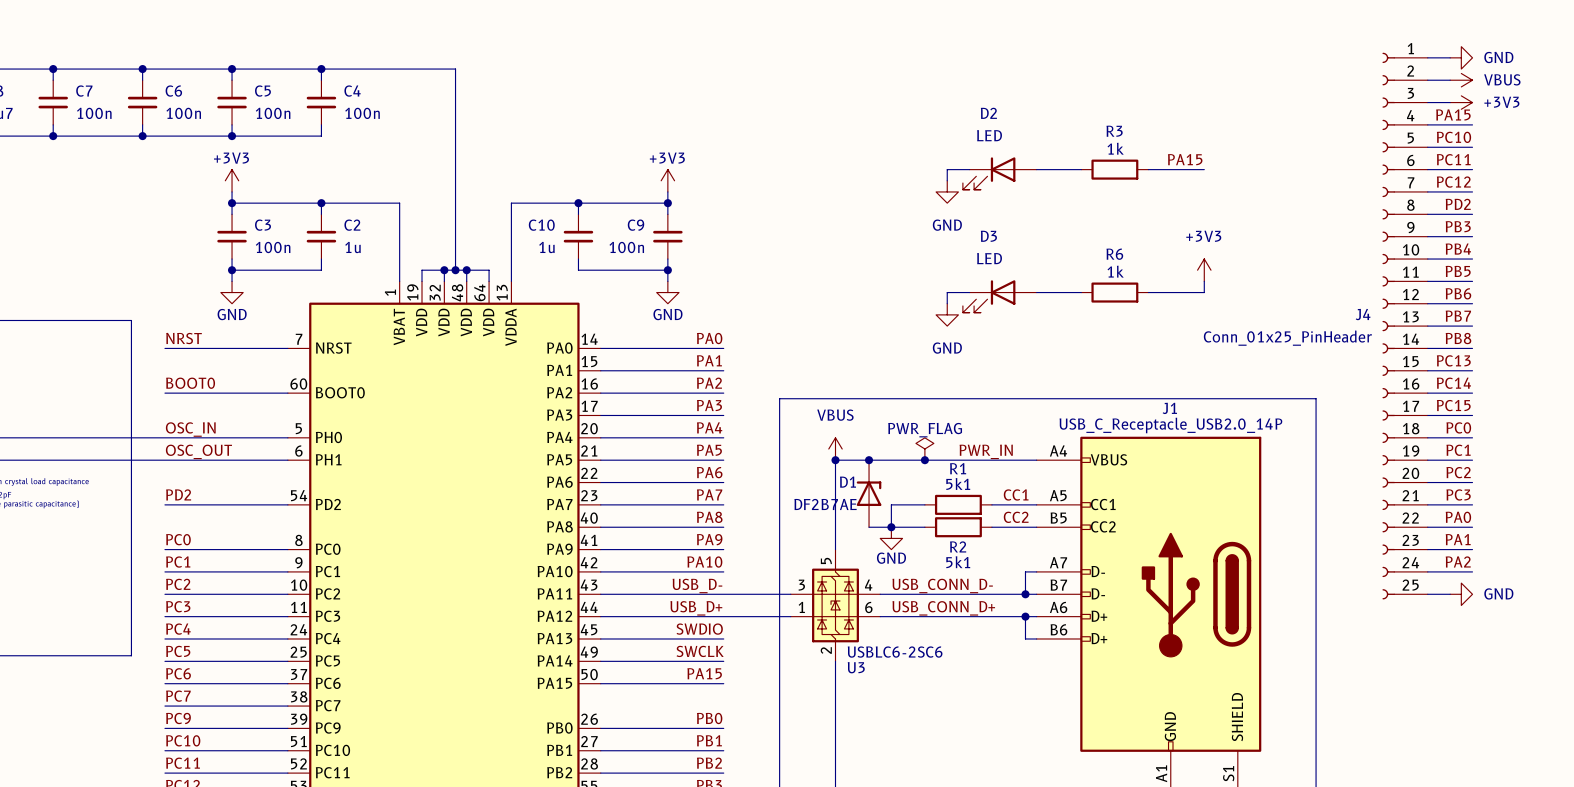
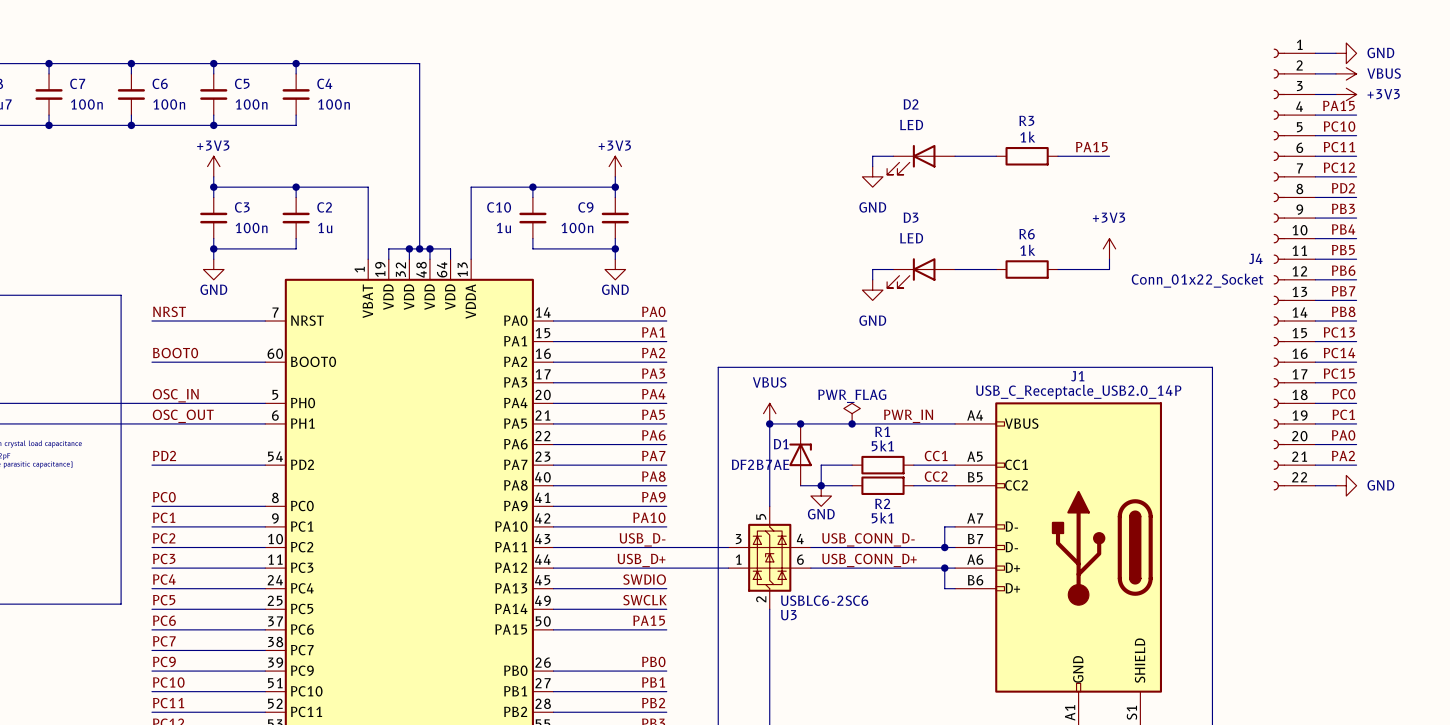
J4 symbol: [1382, 52, 1428, 600] -> [1273, 48, 1316, 491]
J4 value: Conn_01x25_PinHeader (1287, 338) -> Conn_01x22_Socket (1197, 280)
label: PC2 (1458, 472) -> PA0 (1343, 435)
label: PC3 (1458, 494) -> PA2 (1343, 455)
label: PA0 (1458, 517) -> none
label: PA1 (1458, 539) -> none
wire: (1427, 549) (1472, 549) -> none
label: PA2 (1458, 561) -> none
wire: (1427, 571) (1472, 571) -> none
wire: (1427, 594) (1450, 594) -> none
power symbol position: GND (1461, 594) -> GND (1346, 485)

